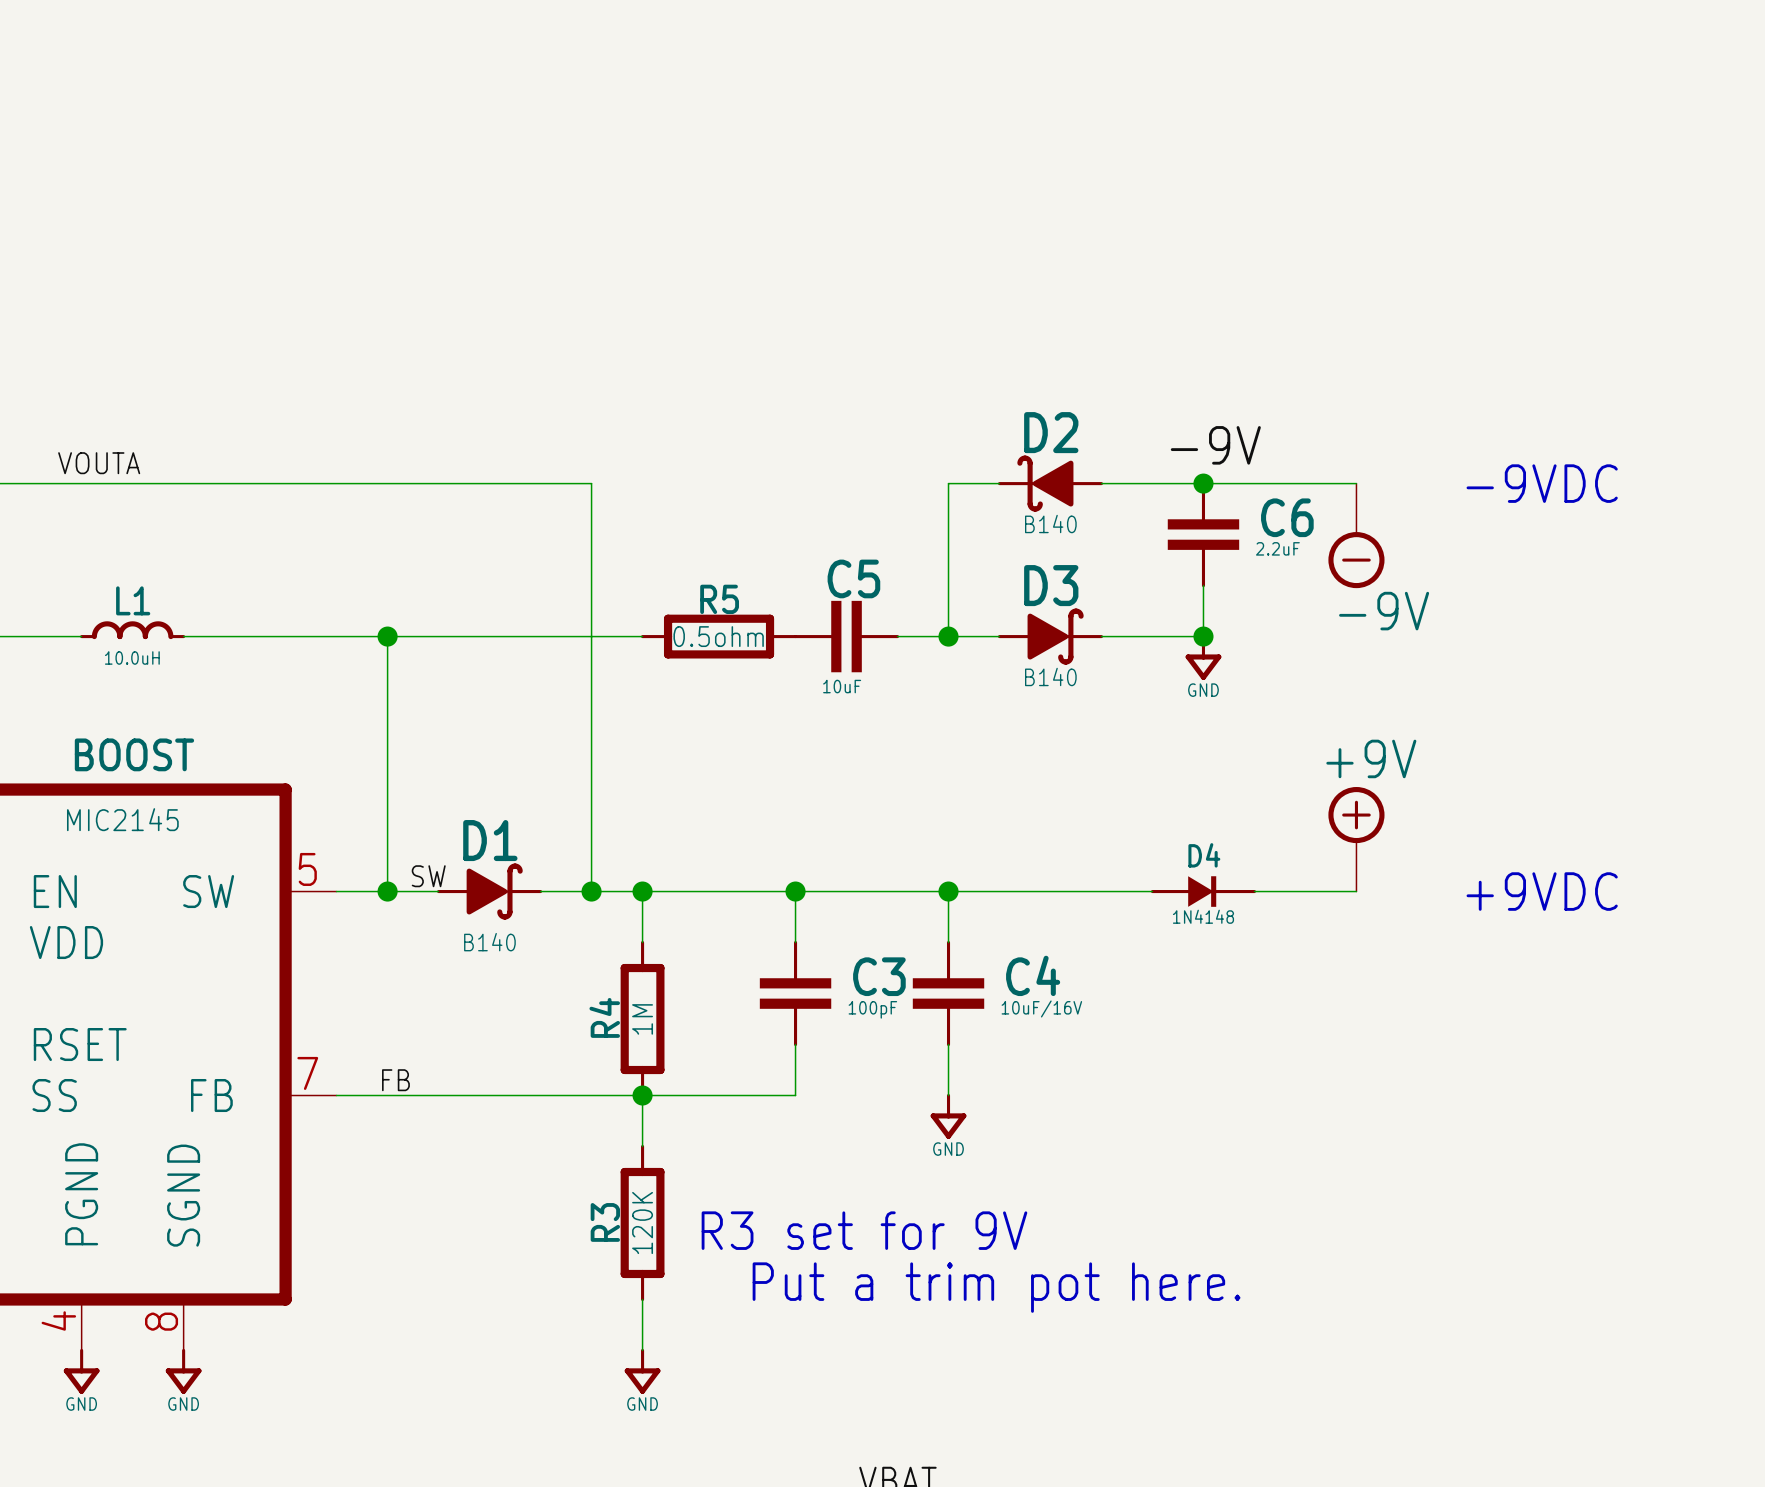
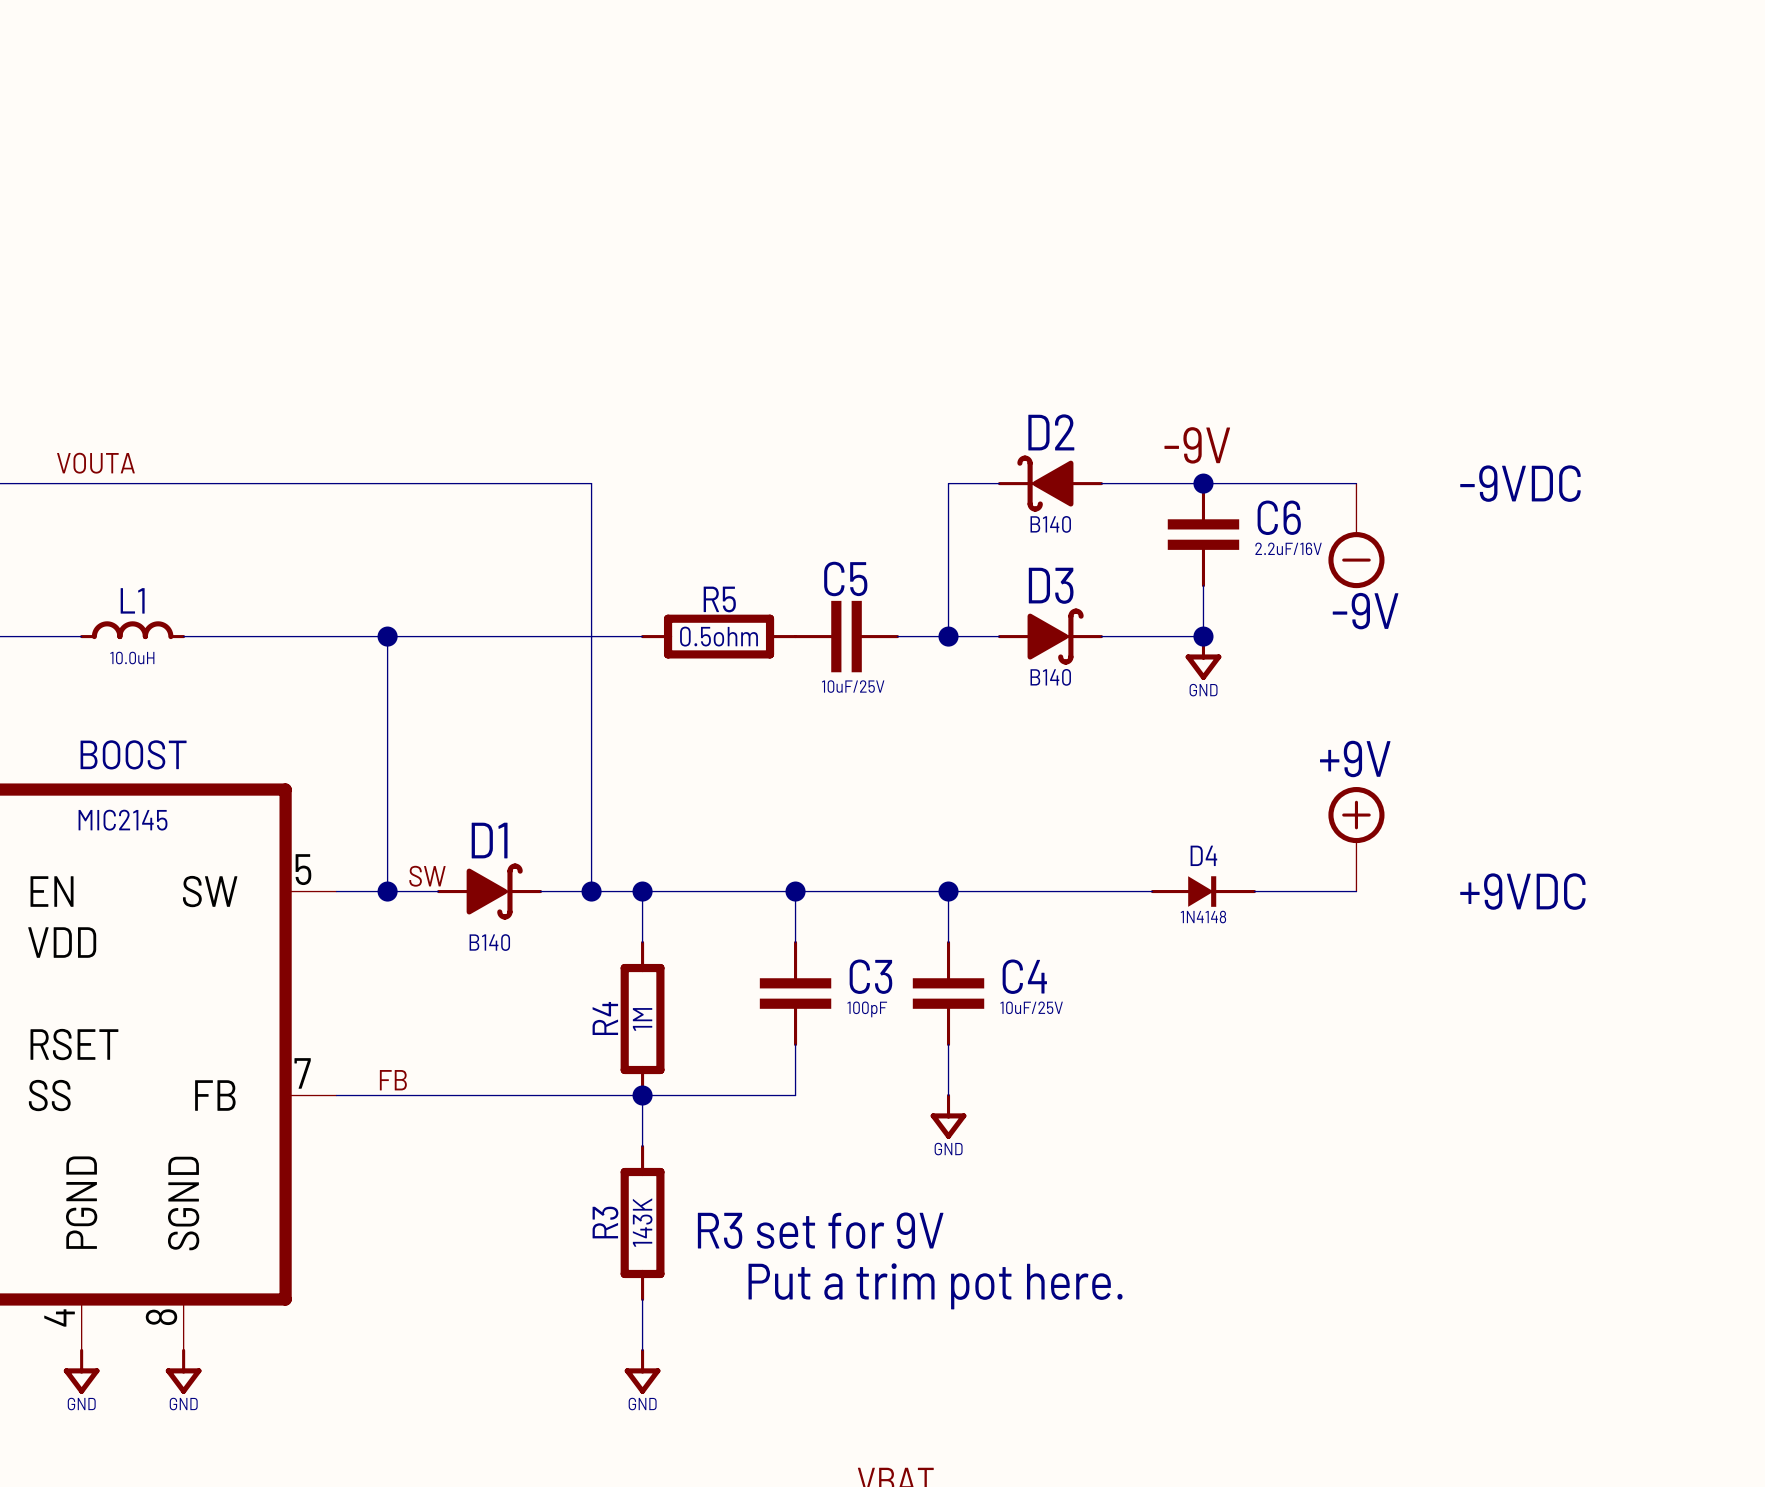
C6 value: 2.2uF (1277, 548) -> 2.2uF/16V (1288, 548)
C5 value: 10uF (842, 686) -> 10uF/25V (853, 686)
C4 value: 10uF/16V (1041, 1008) -> 10uF/25V (1031, 1007)
R3 value: 120K (642, 1222) -> 143K (642, 1222)

